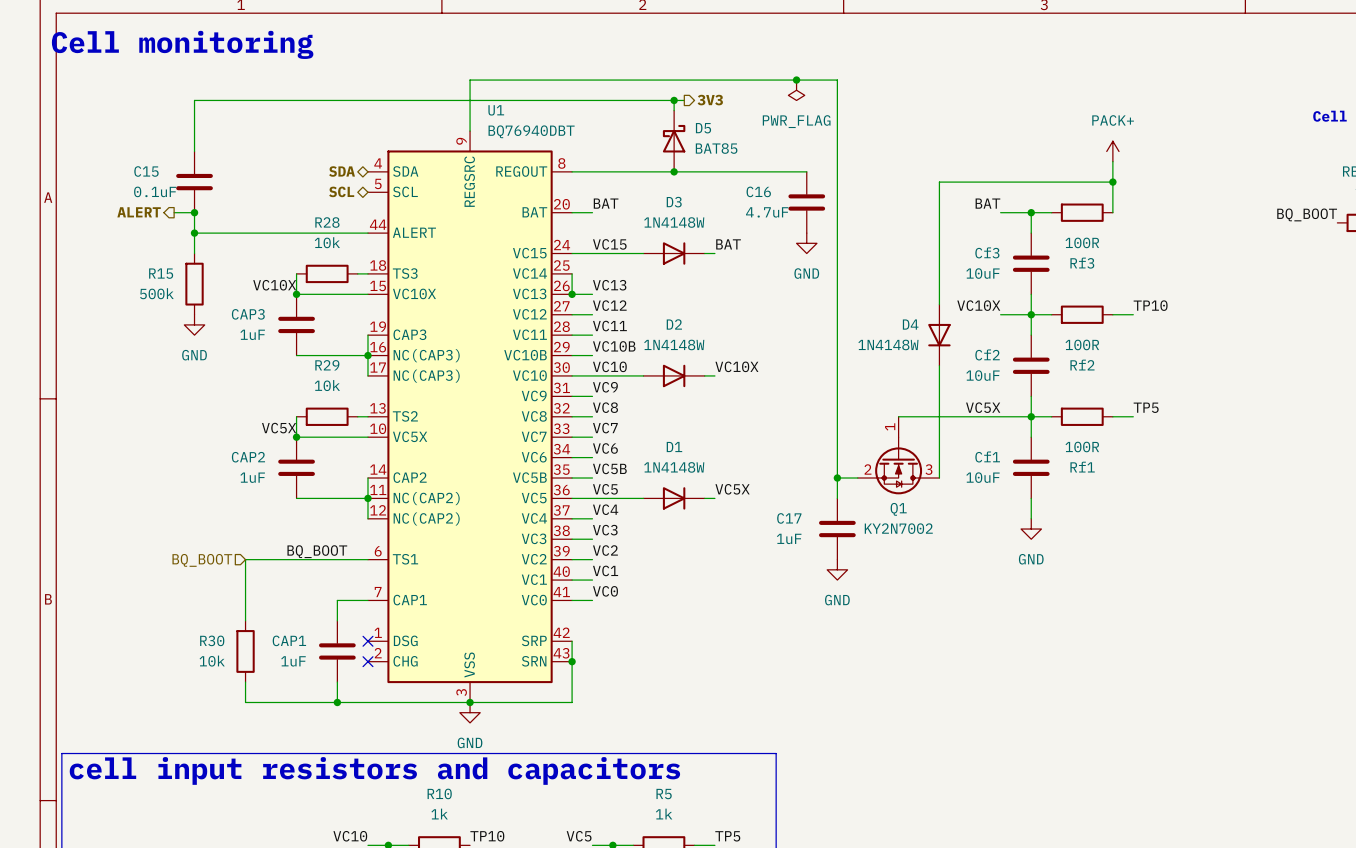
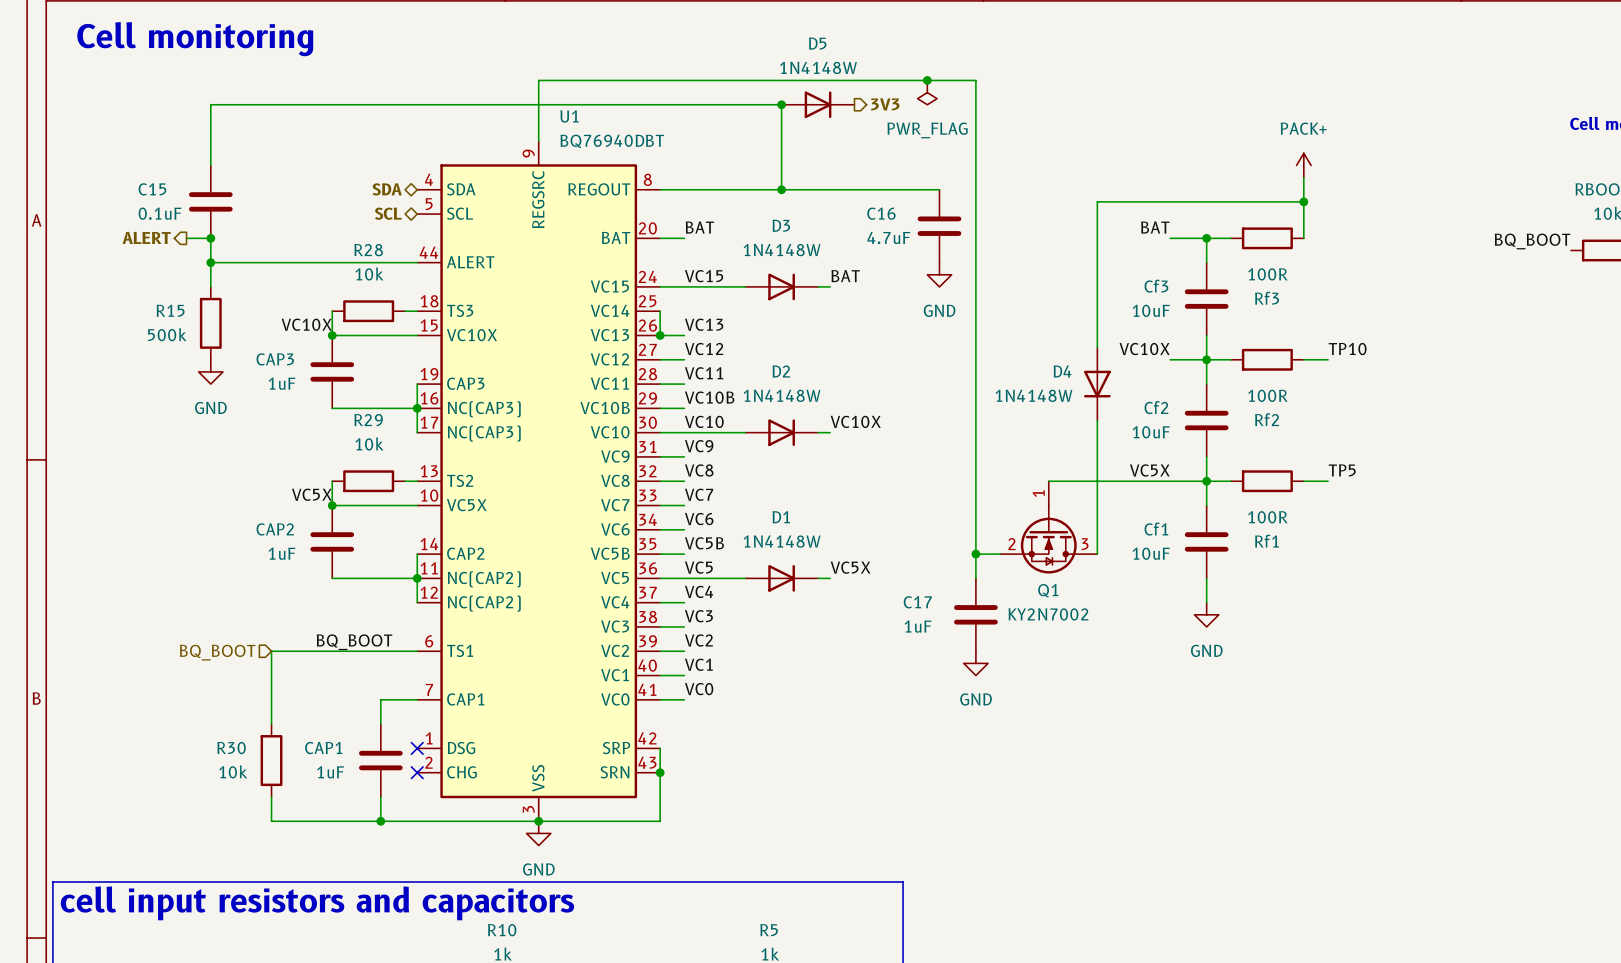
hierarchical label position: 3V3 (710, 100) -> 3V3 (885, 104)
D5 symbol: [662, 110, 686, 172] -> [781, 91, 855, 119]
D5 name position: D5 (703, 128) -> D5 (817, 43)
D5 value: BAT85 (716, 148) -> 1N4148W (818, 67)

